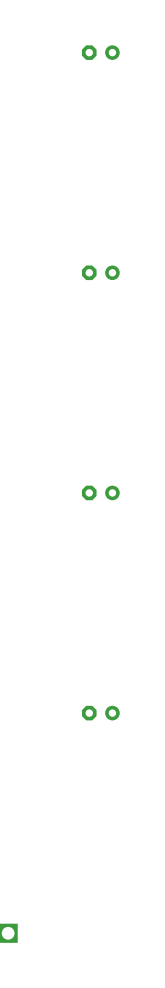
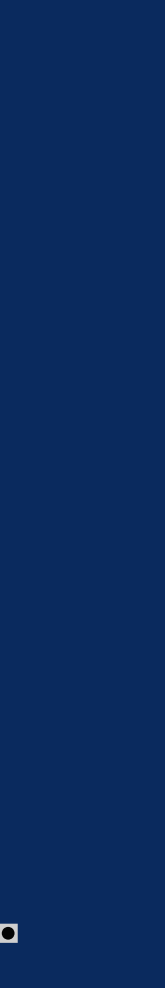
part: (100, 52) -> none
part: (100, 272) -> none
part: (100, 492) -> none
part: (100, 713) -> none

